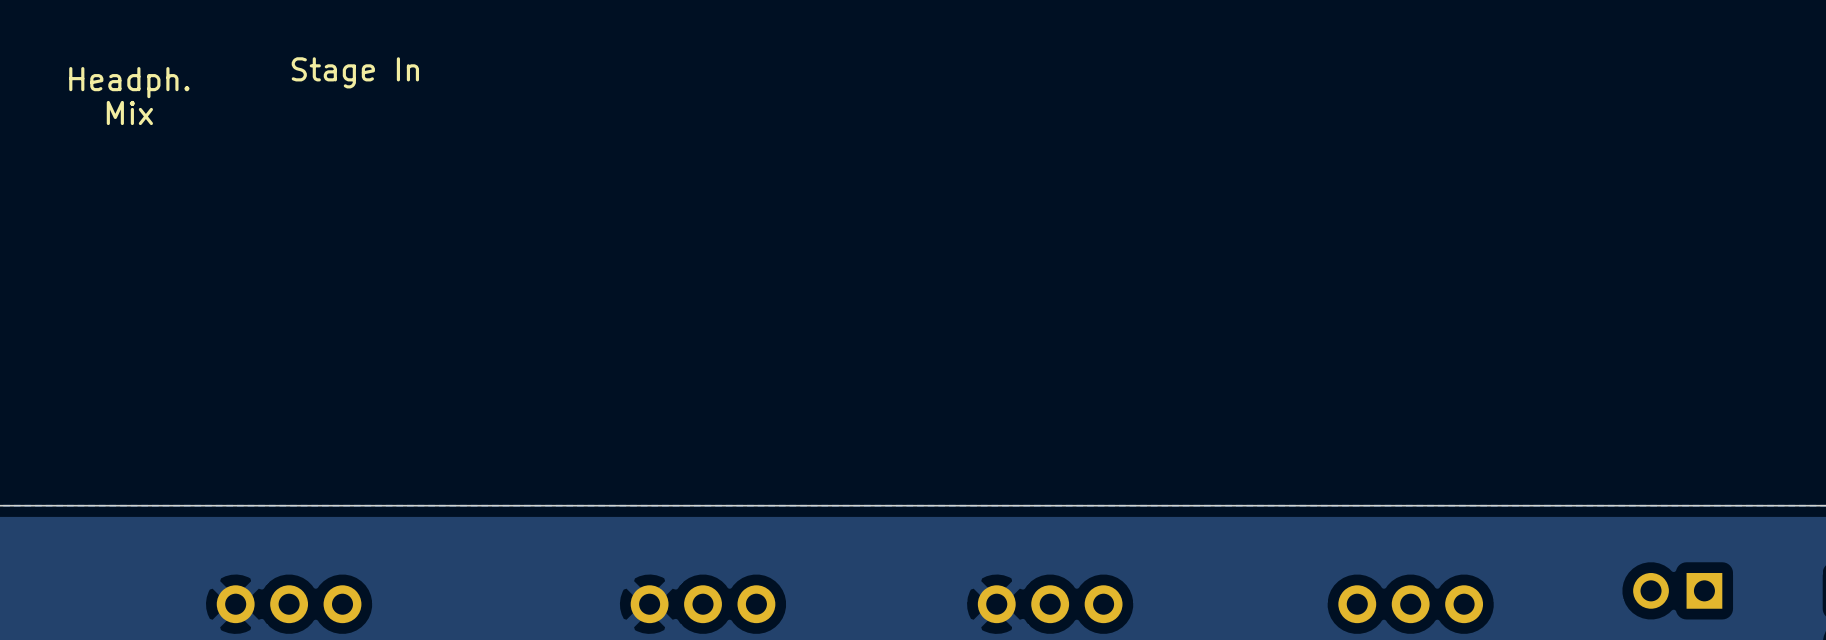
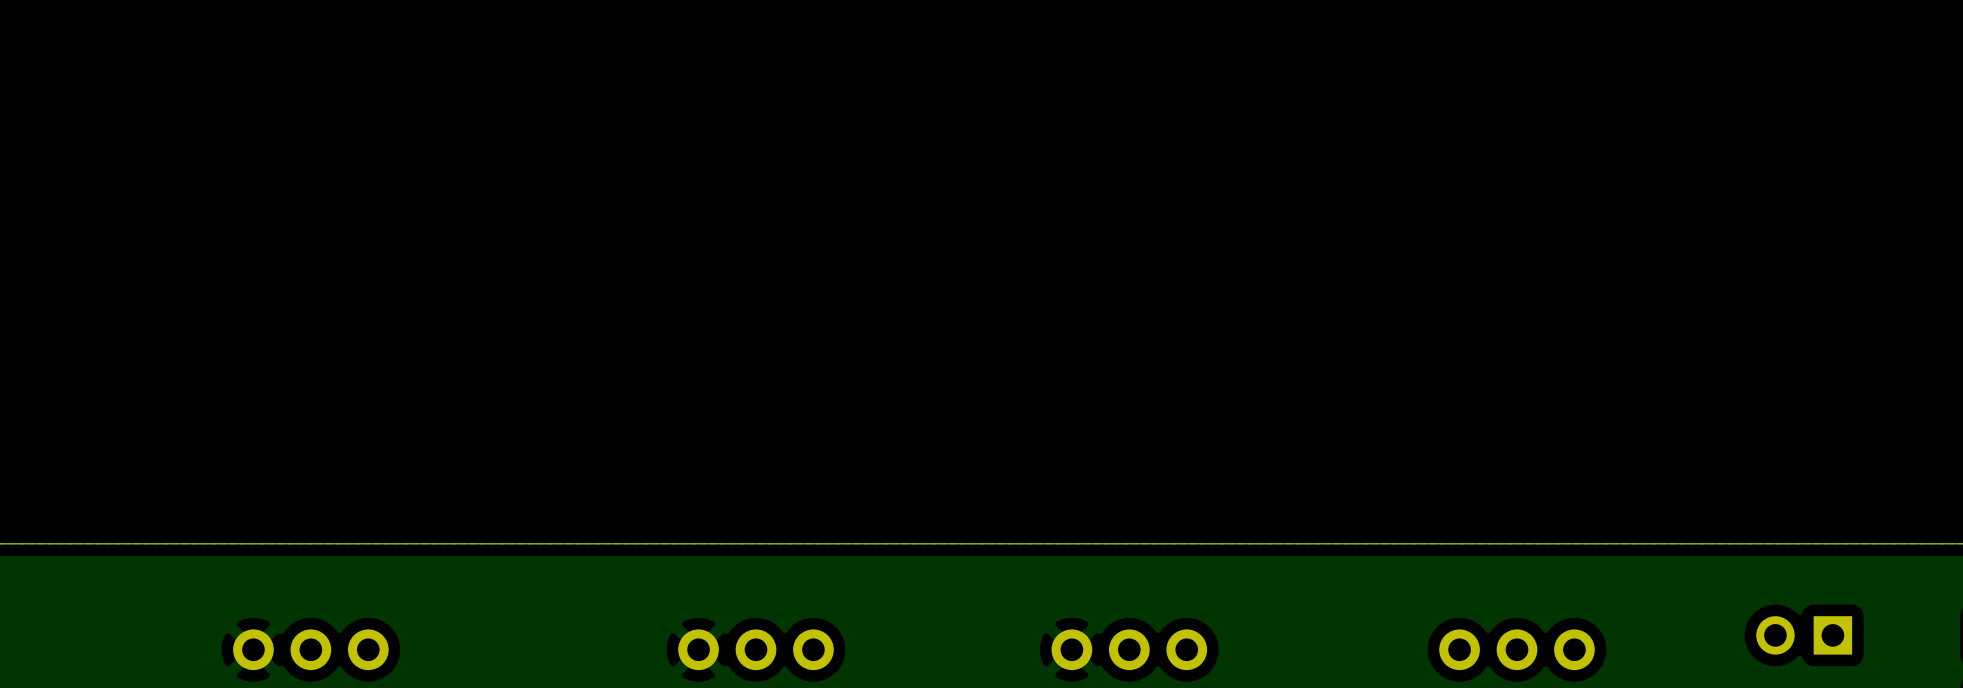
text: Stage In (355, 72) -> none
text: Headph. (129, 82) -> none
text: Mix (129, 112) -> none

